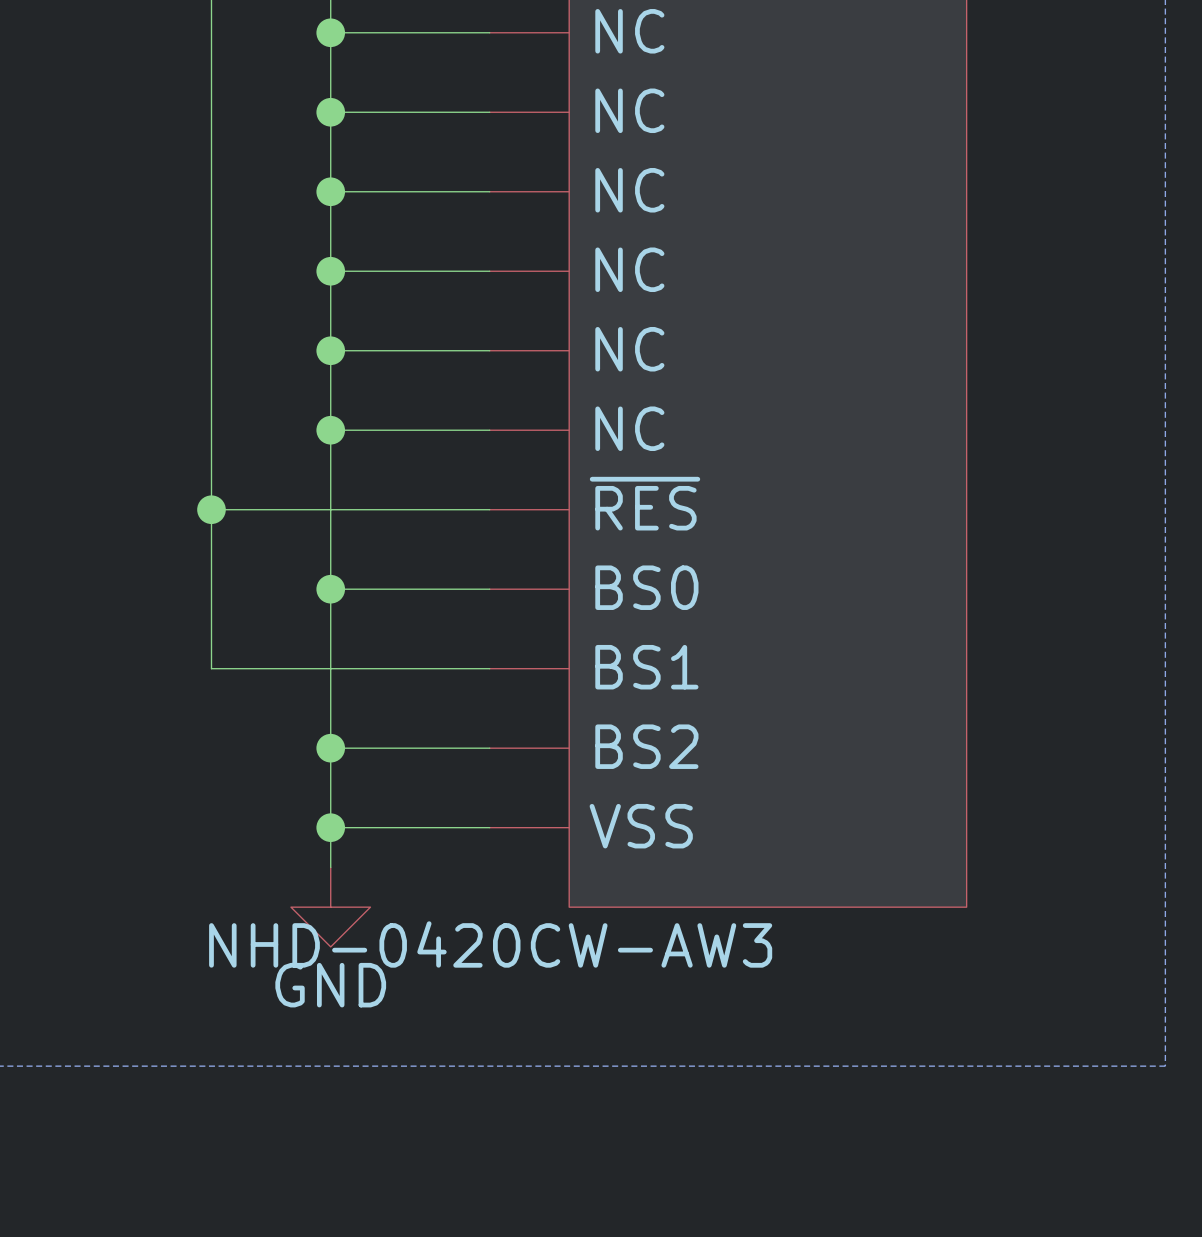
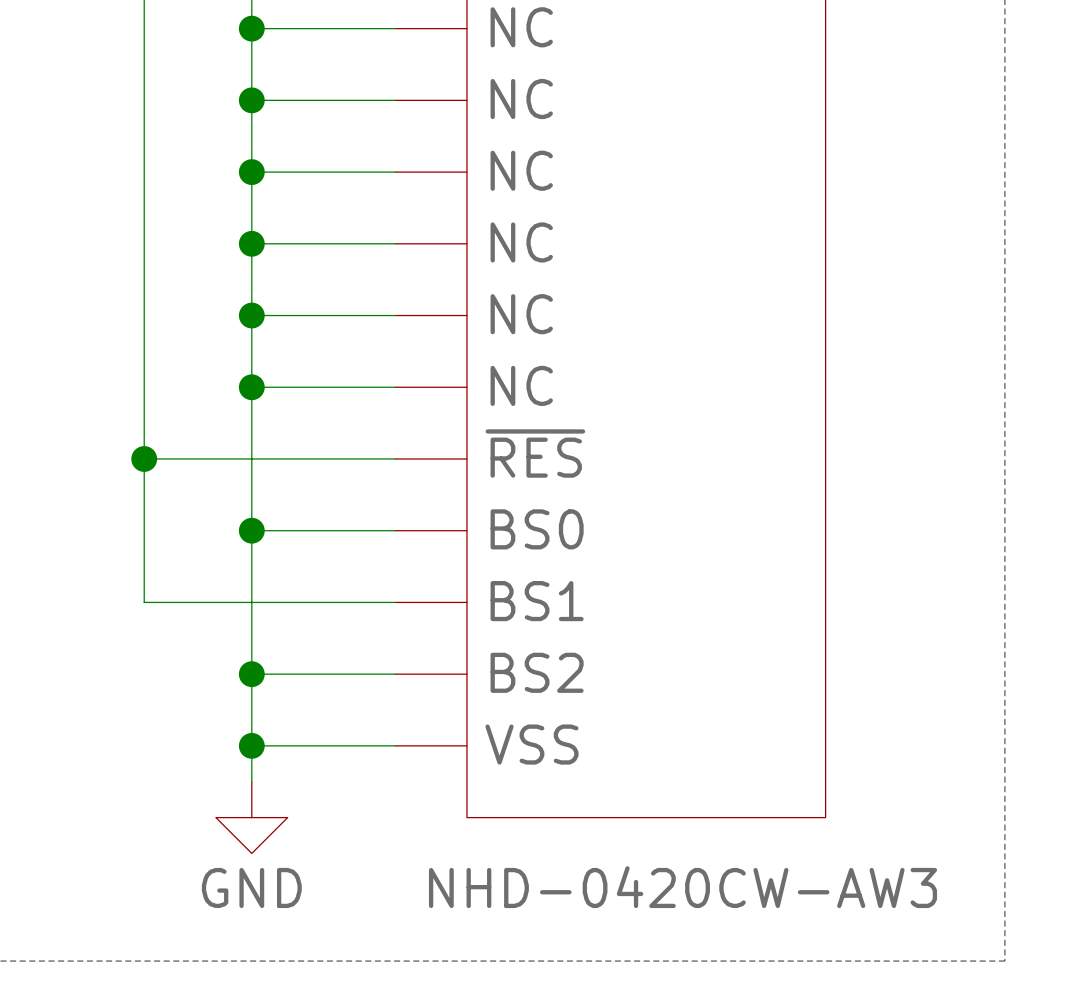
part value position: NHD-0420CW-AW3 (490, 944) -> NHD-0420CW-AW3 (683, 887)

